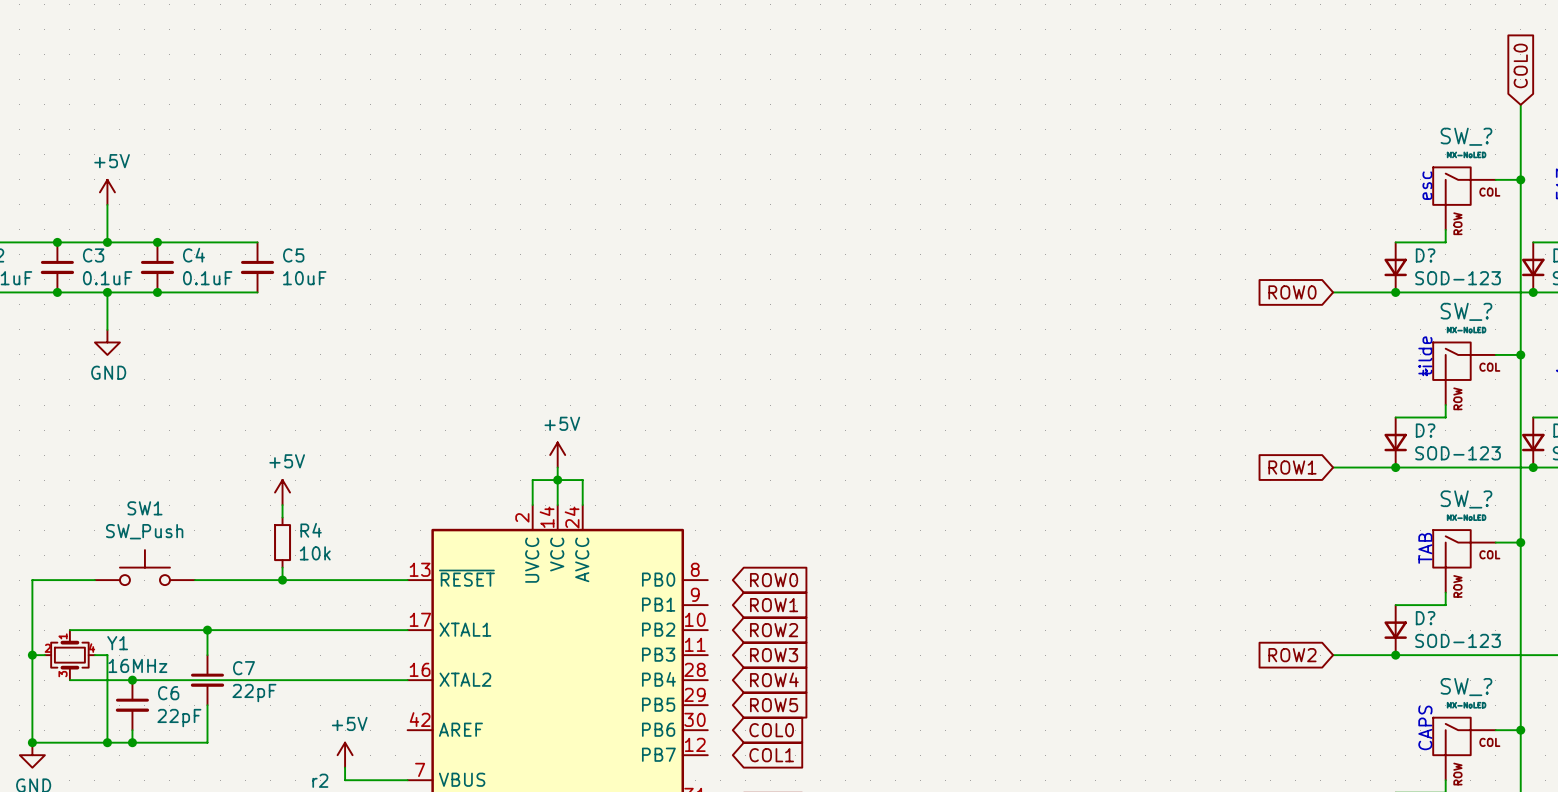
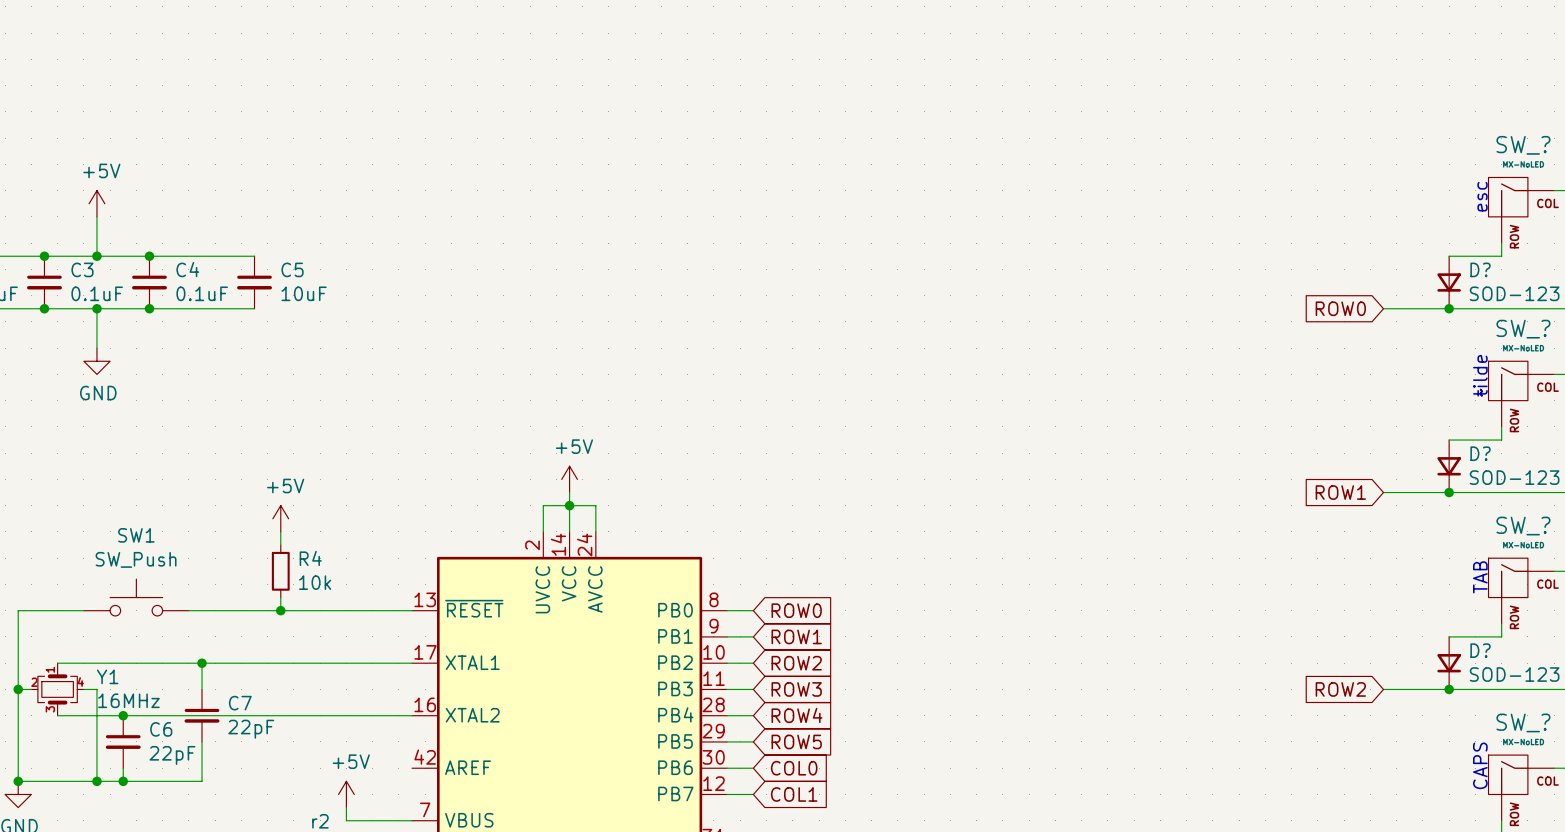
wire: none -> (727, 610) (753, 610)
wire: none -> (727, 636) (753, 636)
wire: none -> (727, 663) (753, 663)
wire: none -> (727, 689) (753, 689)
wire: none -> (727, 715) (753, 715)
wire: none -> (727, 741) (753, 741)
wire: none -> (727, 768) (753, 768)
wire: none -> (727, 794) (753, 794)

